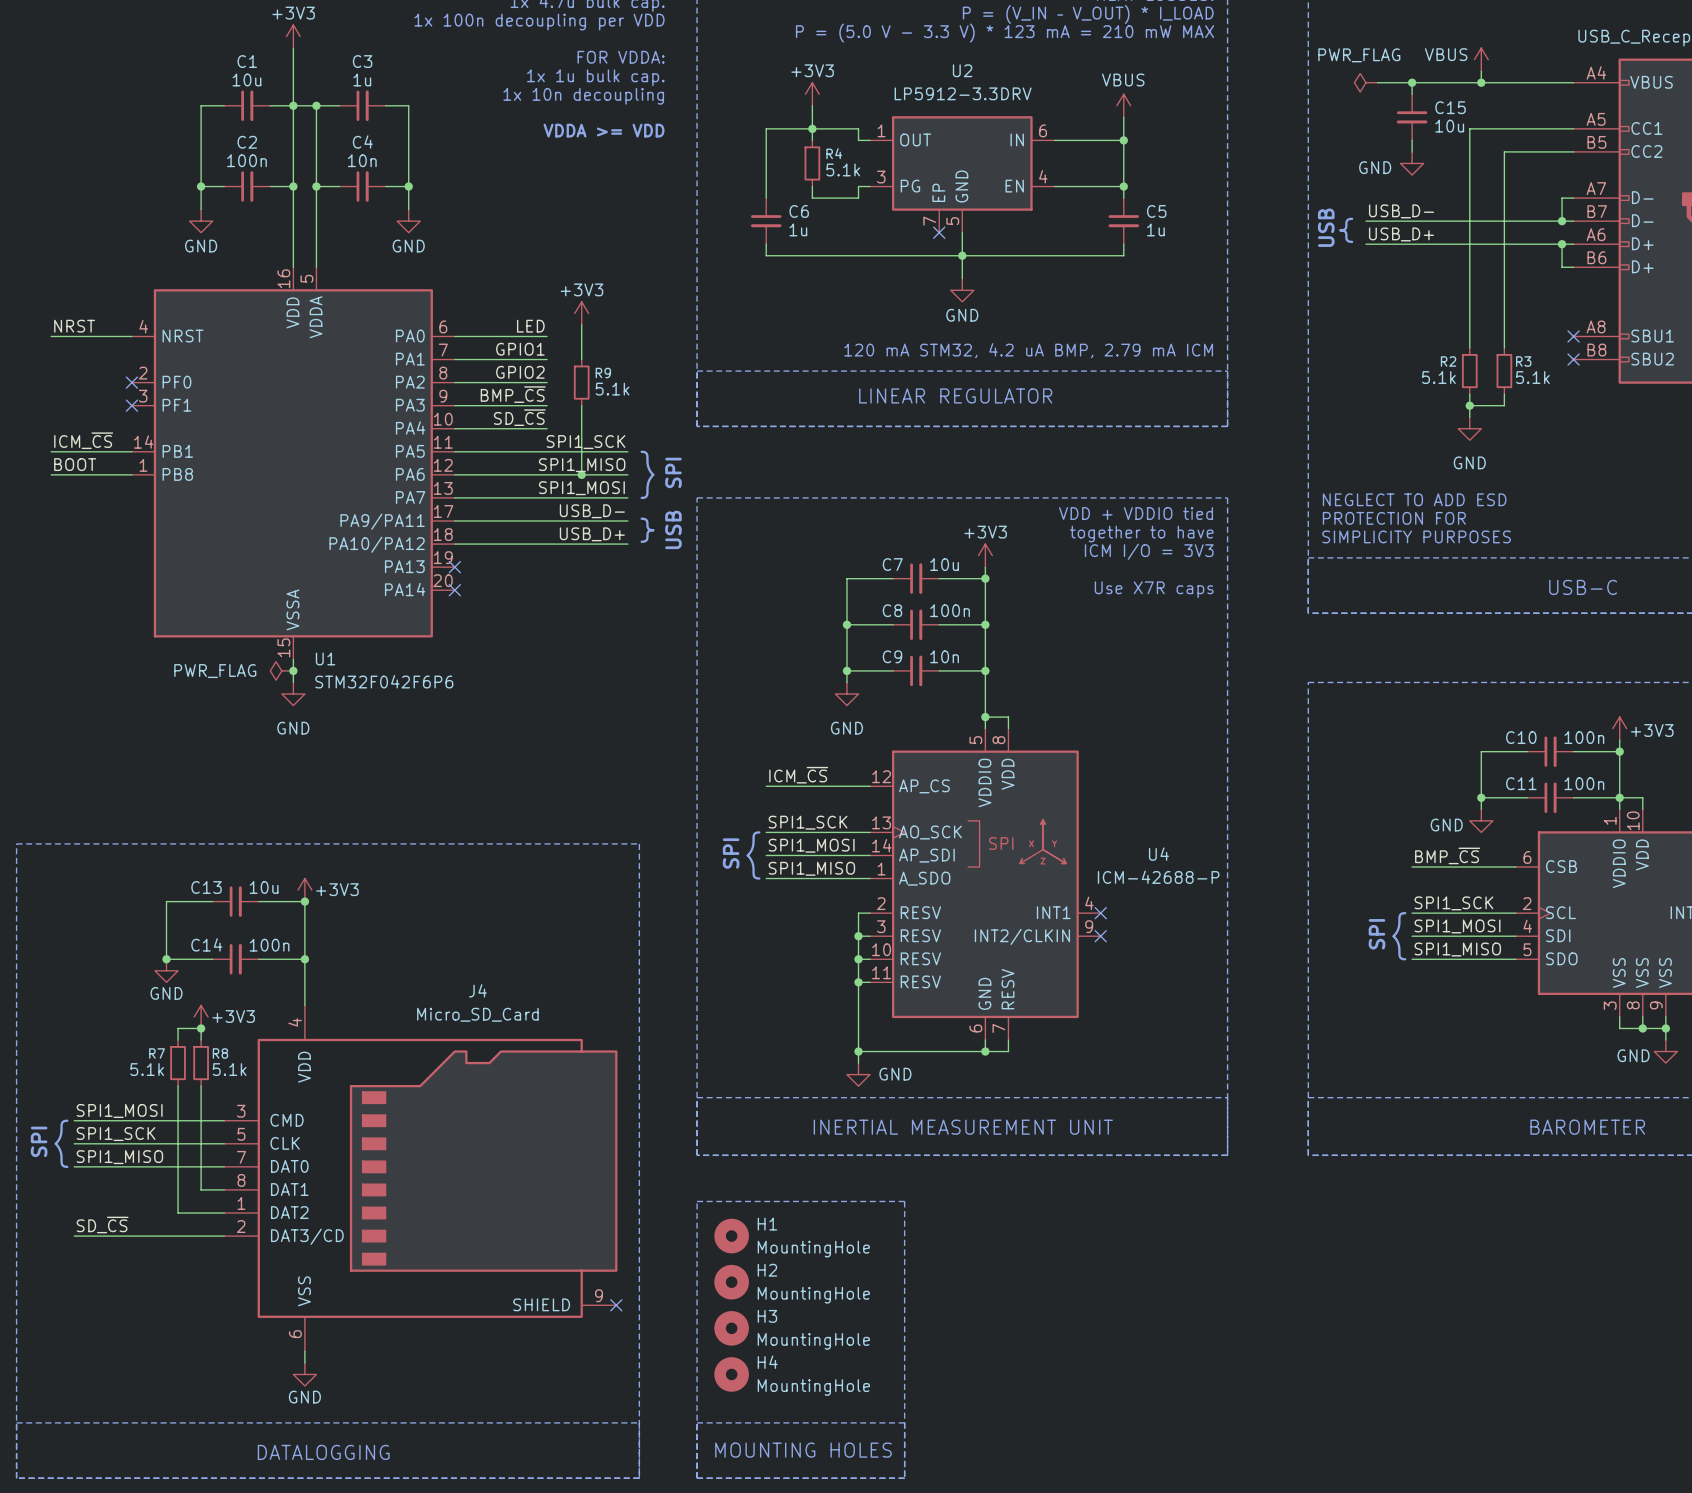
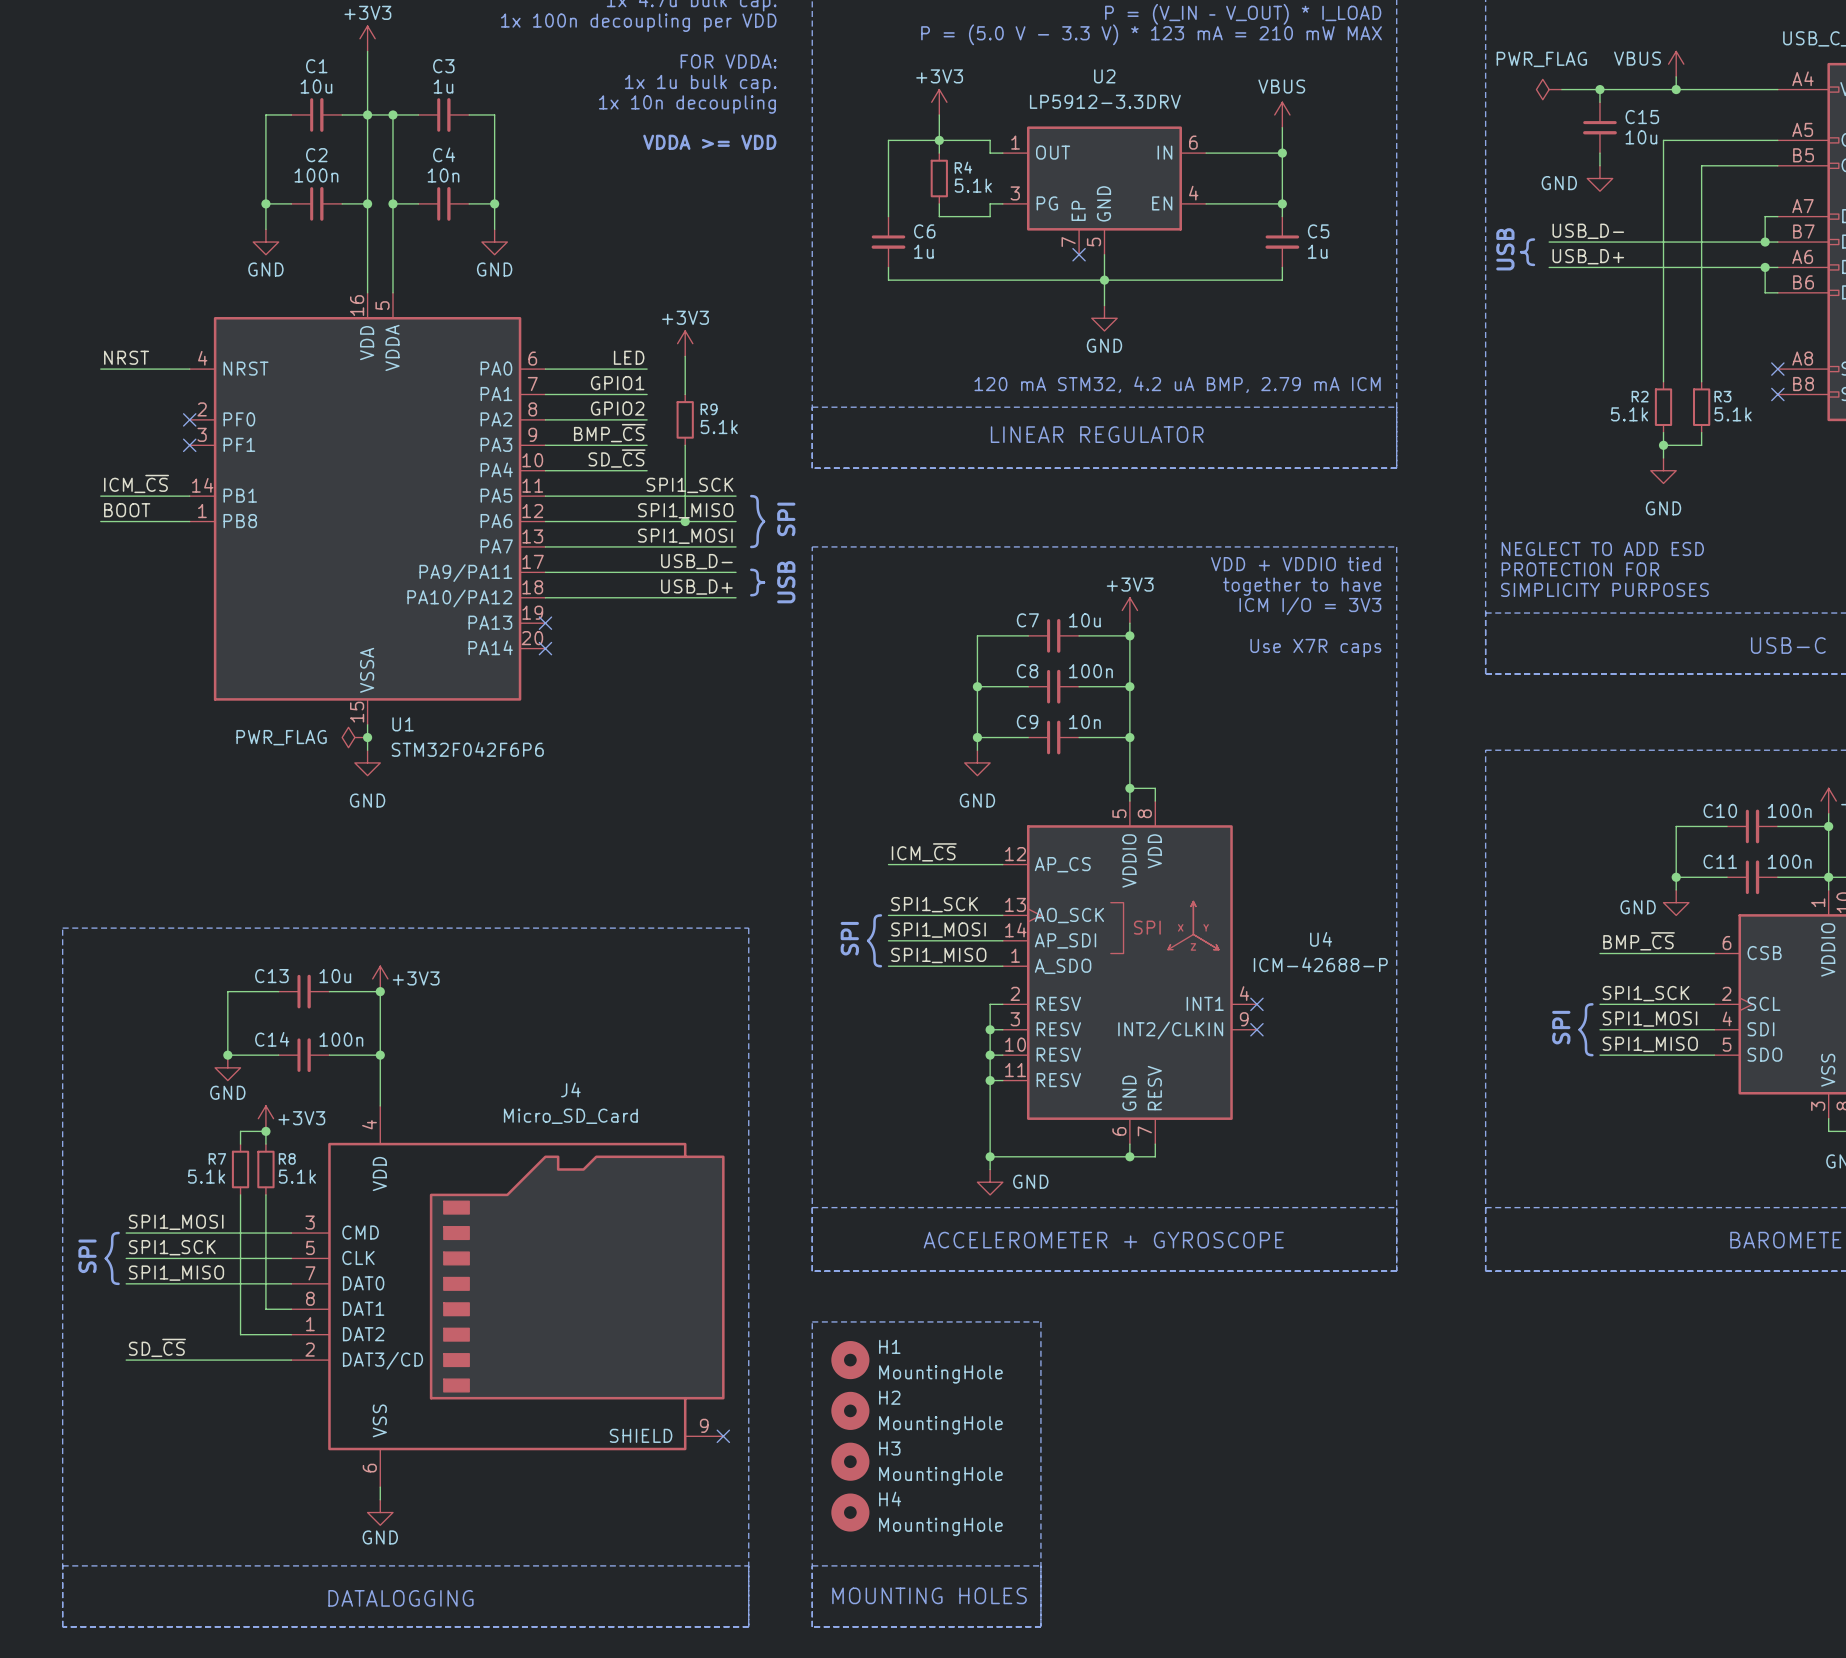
text: INERTIAL MEASUREMENT UNIT (963, 1127) -> ACCELEROMETER + GYROSCOPE (1103, 1240)

